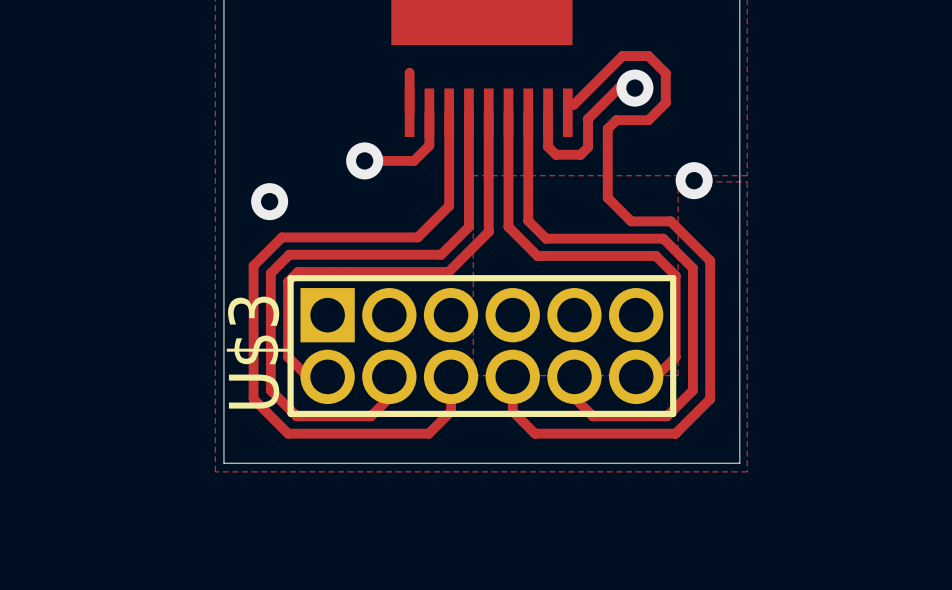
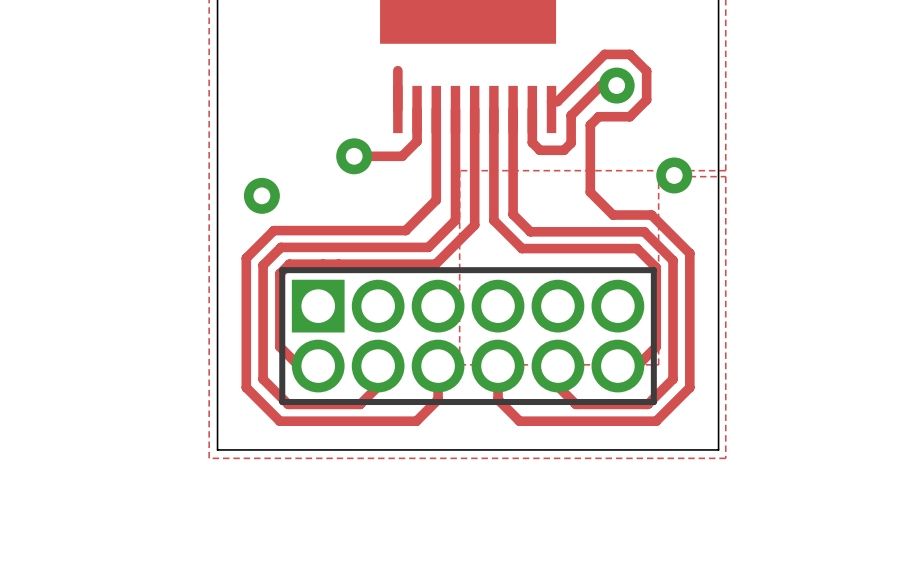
U$3 name: U$3 (257, 352) -> none

